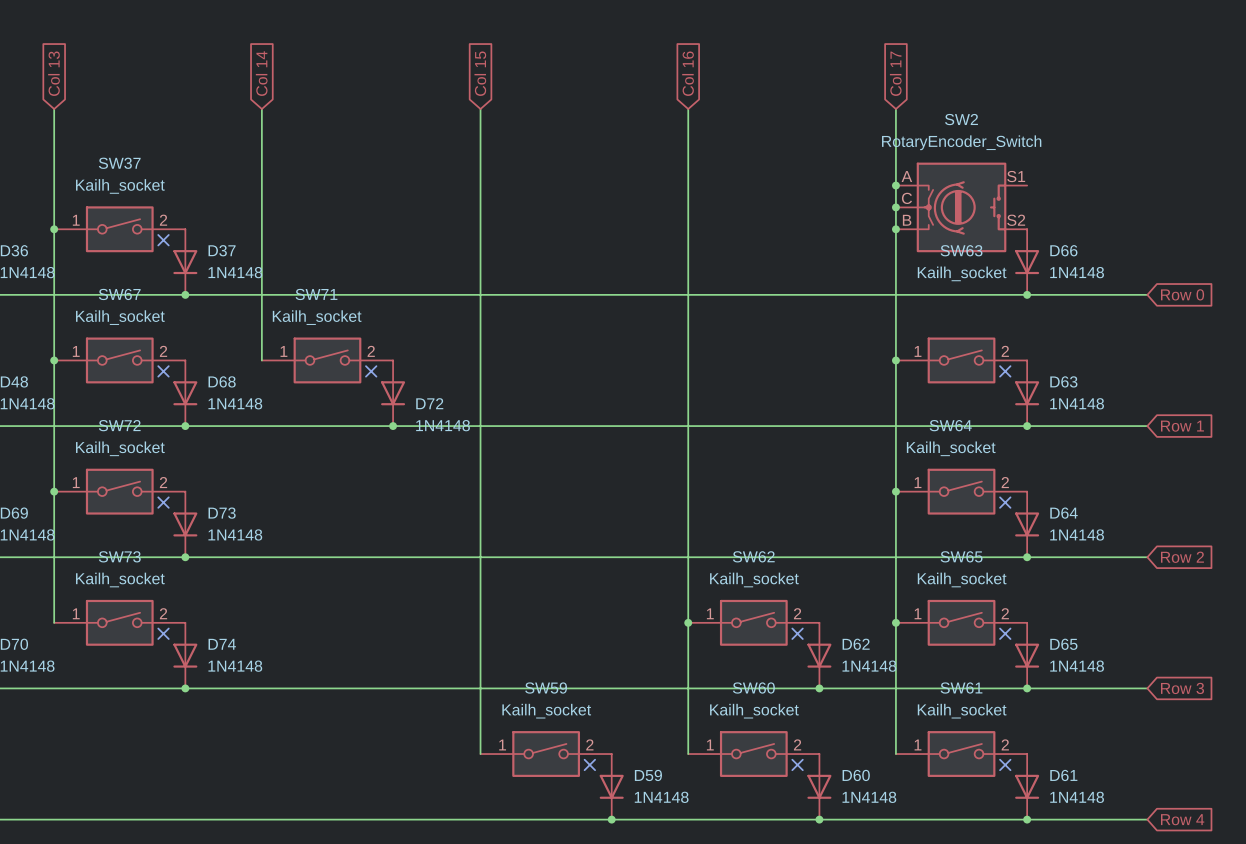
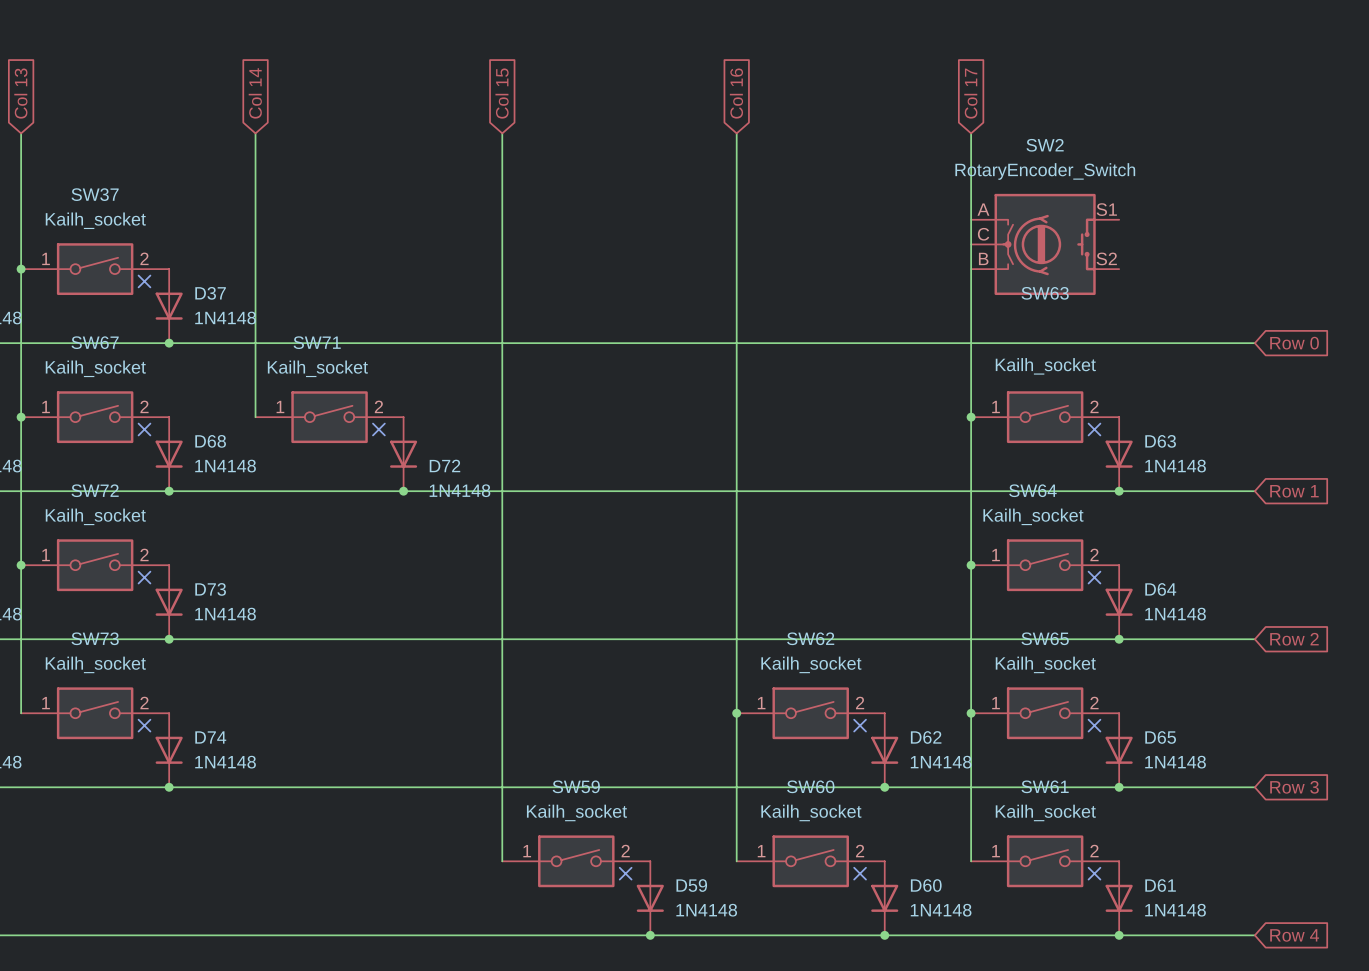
junction: (895, 185) -> none
junction: (895, 207) -> none
junction: (895, 229) -> none
D66: 1N4148 (1027, 262) -> none
SW63 value position: Kailh_socket (962, 273) -> Kailh_socket (1045, 366)
junction: (1027, 294) -> none

